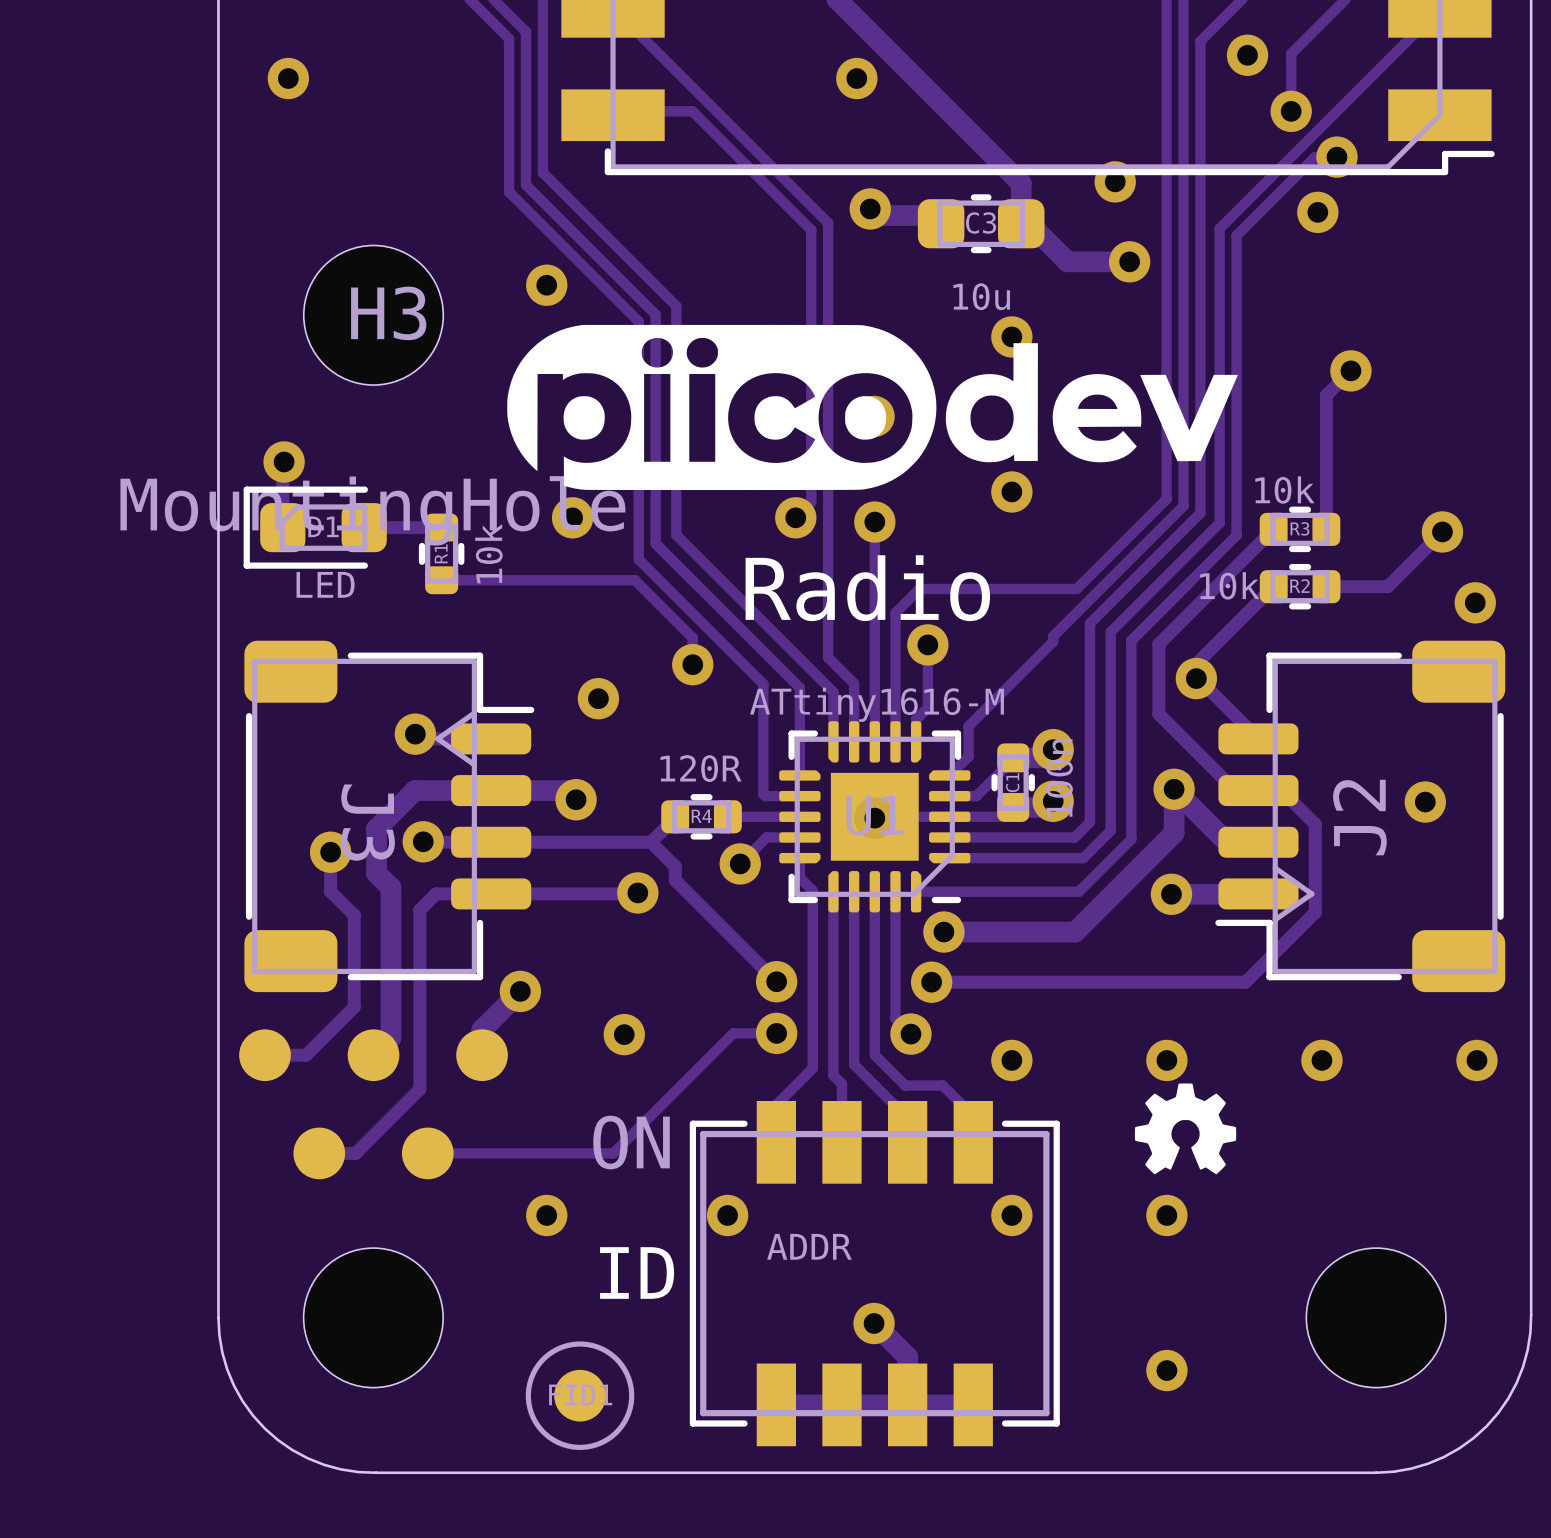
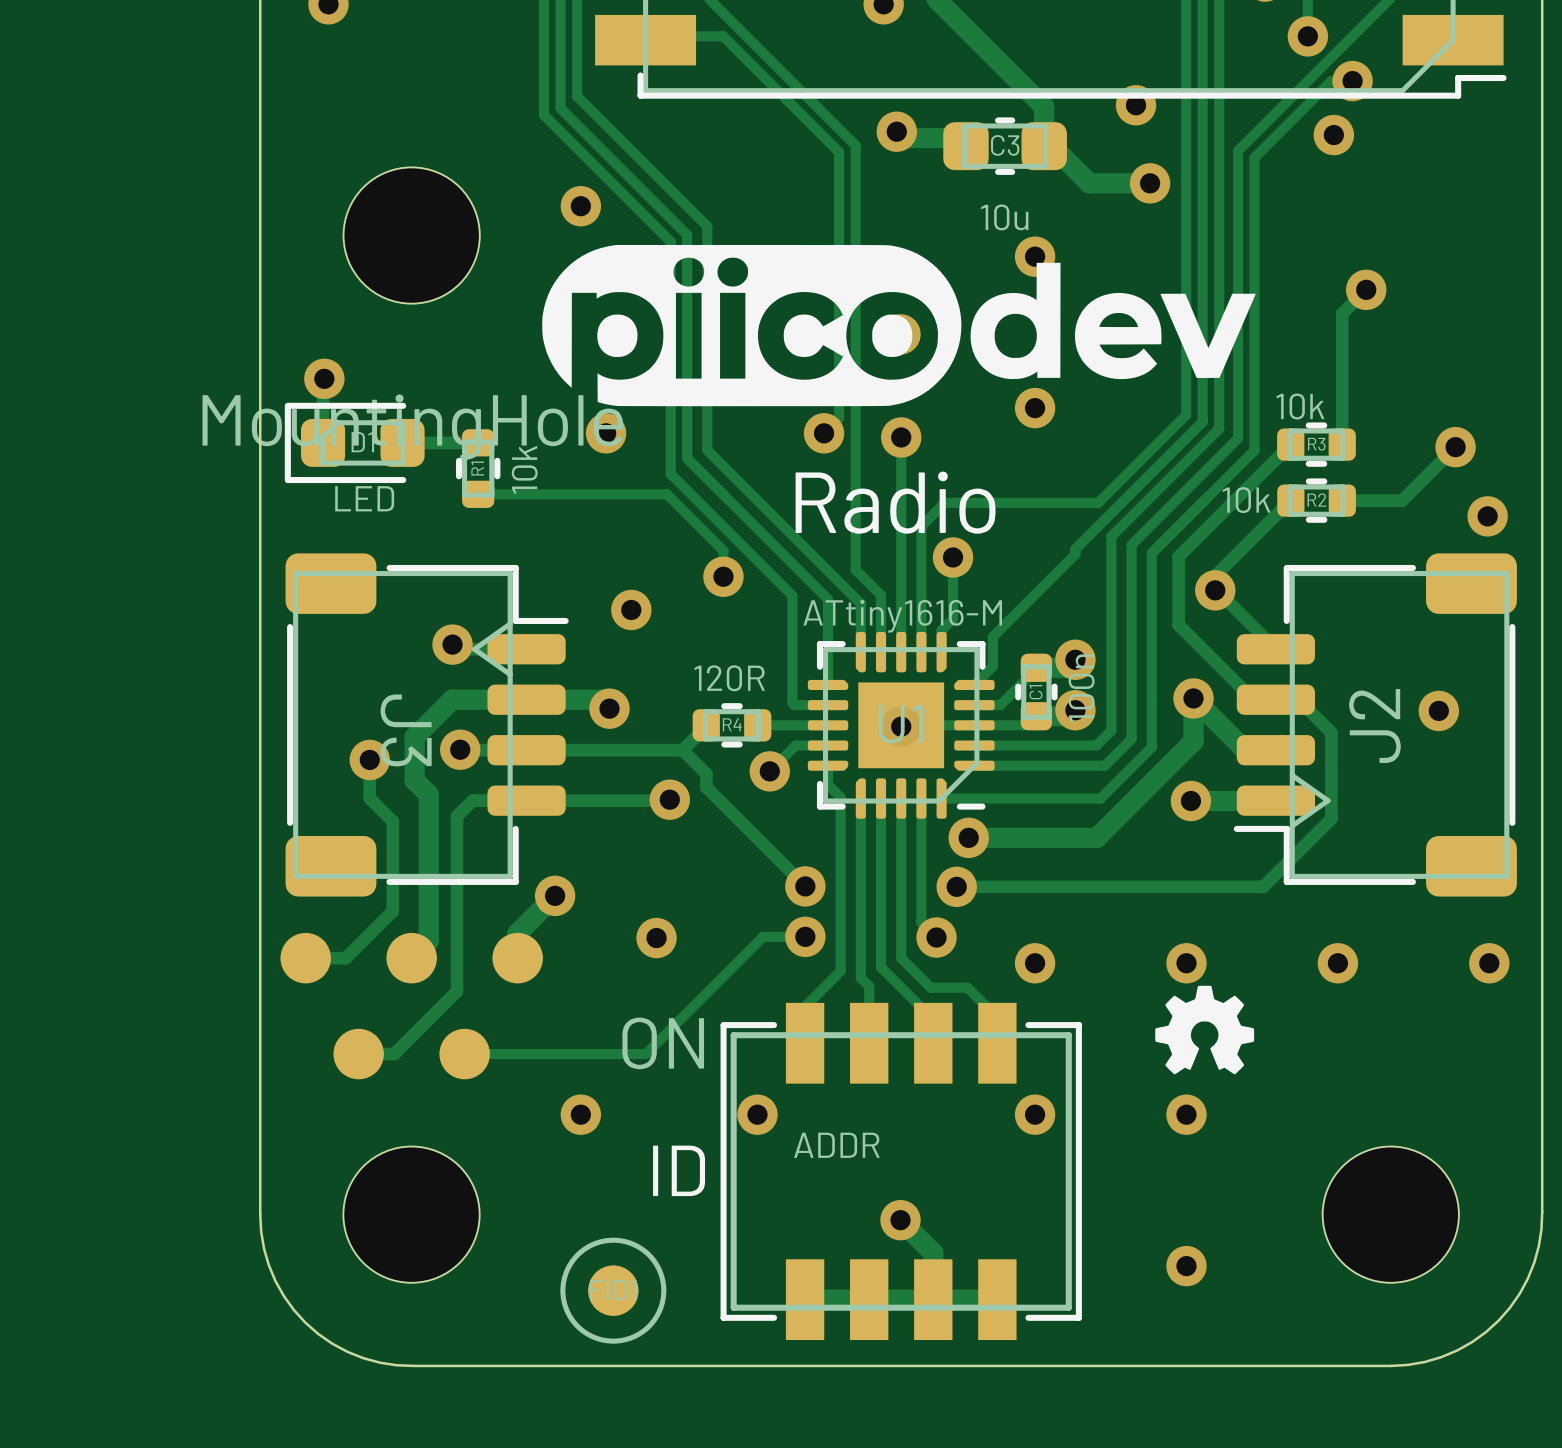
H3 name: H3 (388, 313) -> none

